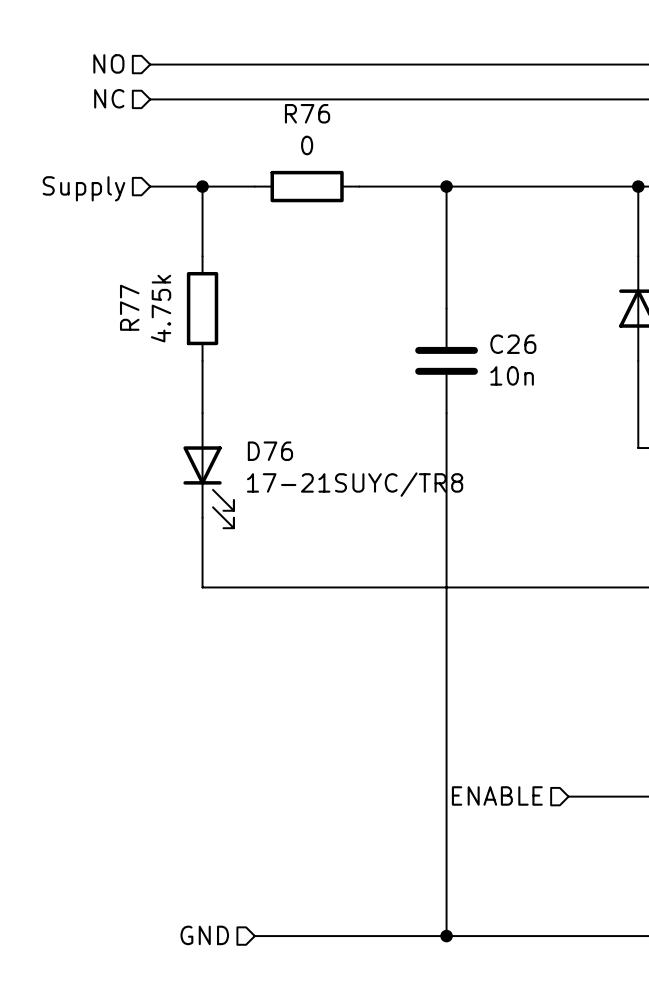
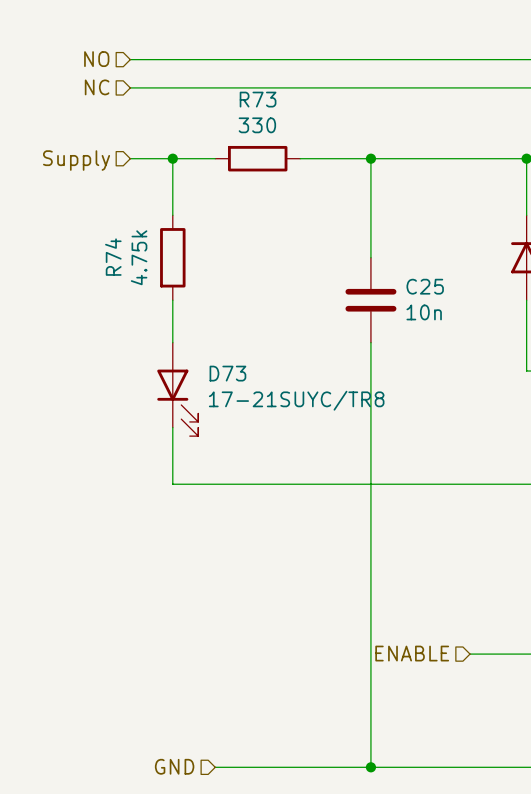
R76 name: R76 (307, 113) -> R73 (258, 99)
R76 value: 0 (307, 145) -> 330 (257, 125)
R77 name: R77 (129, 307) -> R74 (113, 257)
C26 name: C26 (513, 344) -> C25 (425, 286)
D76 name: D76 (270, 451) -> D73 (227, 373)

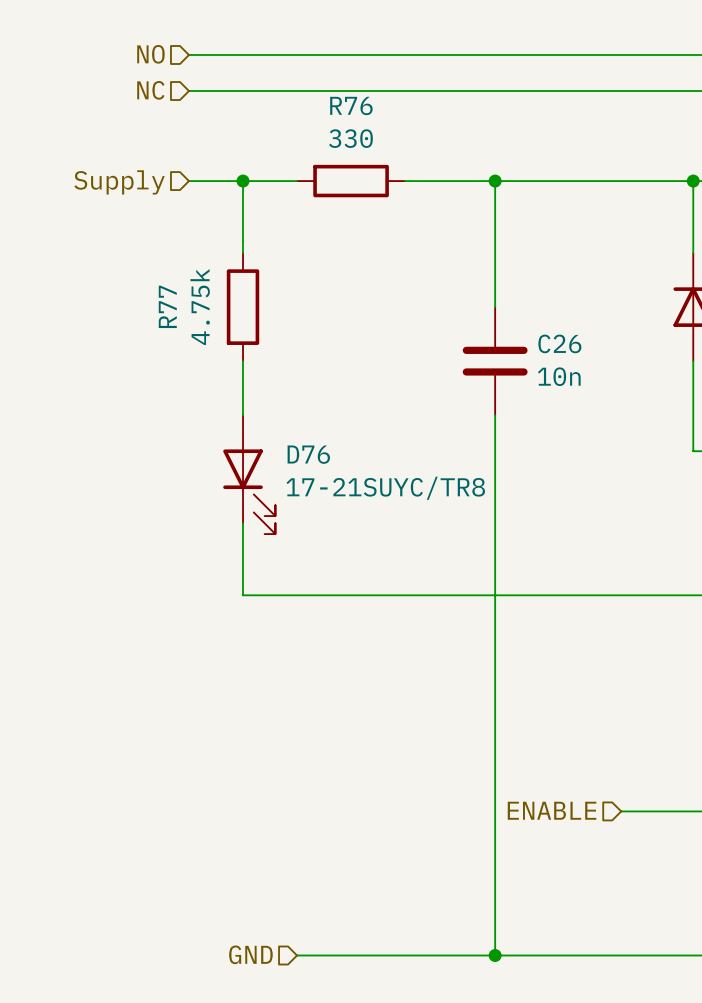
R73 name: R73 (258, 99) -> R76 (351, 105)
R74 name: R74 (113, 257) -> R77 (167, 306)
C25 name: C25 (425, 286) -> C26 (559, 343)
D73 name: D73 (227, 373) -> D76 (308, 454)

